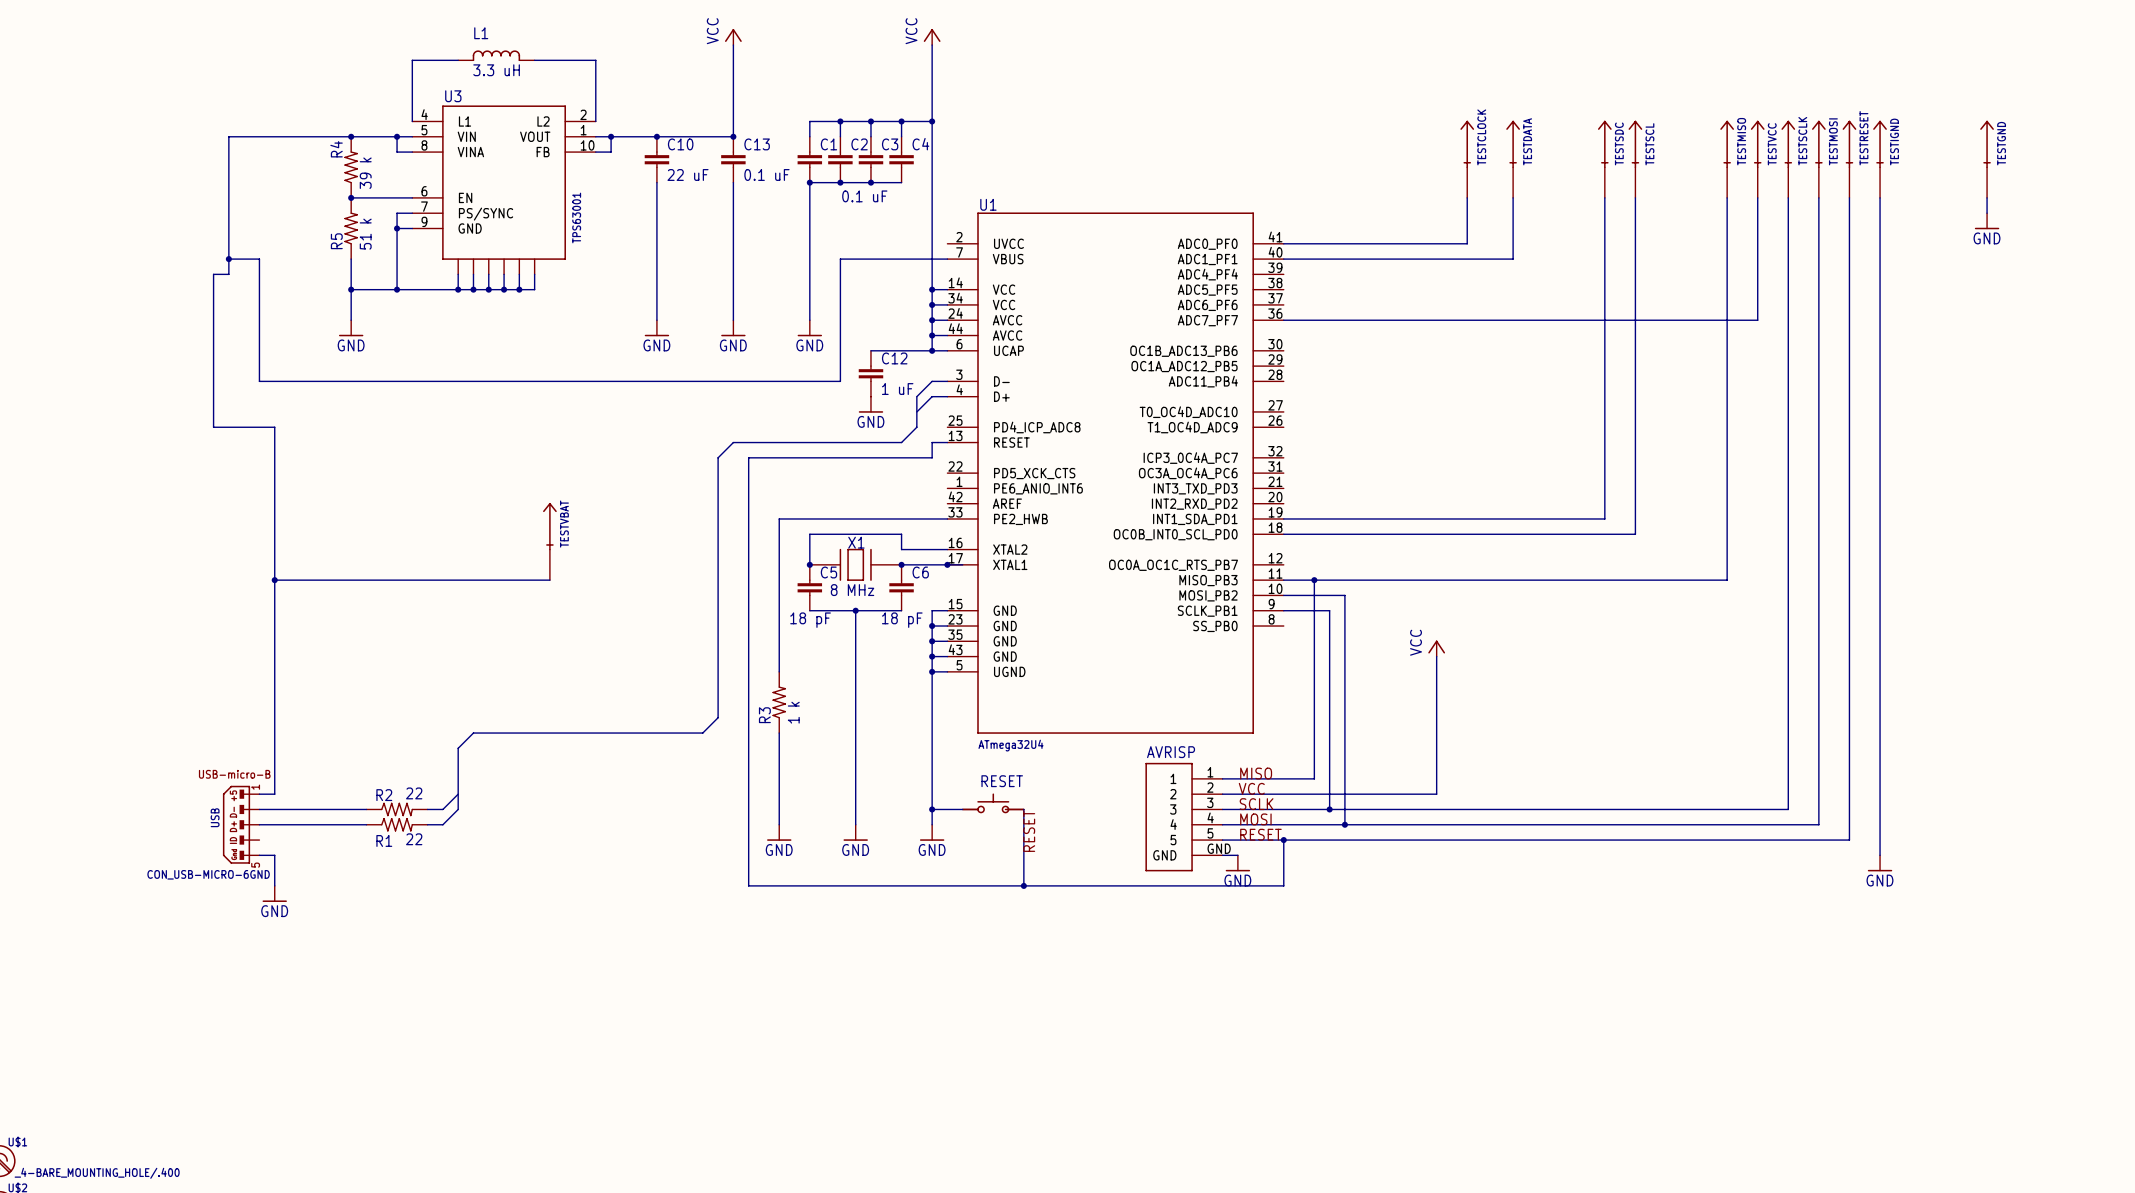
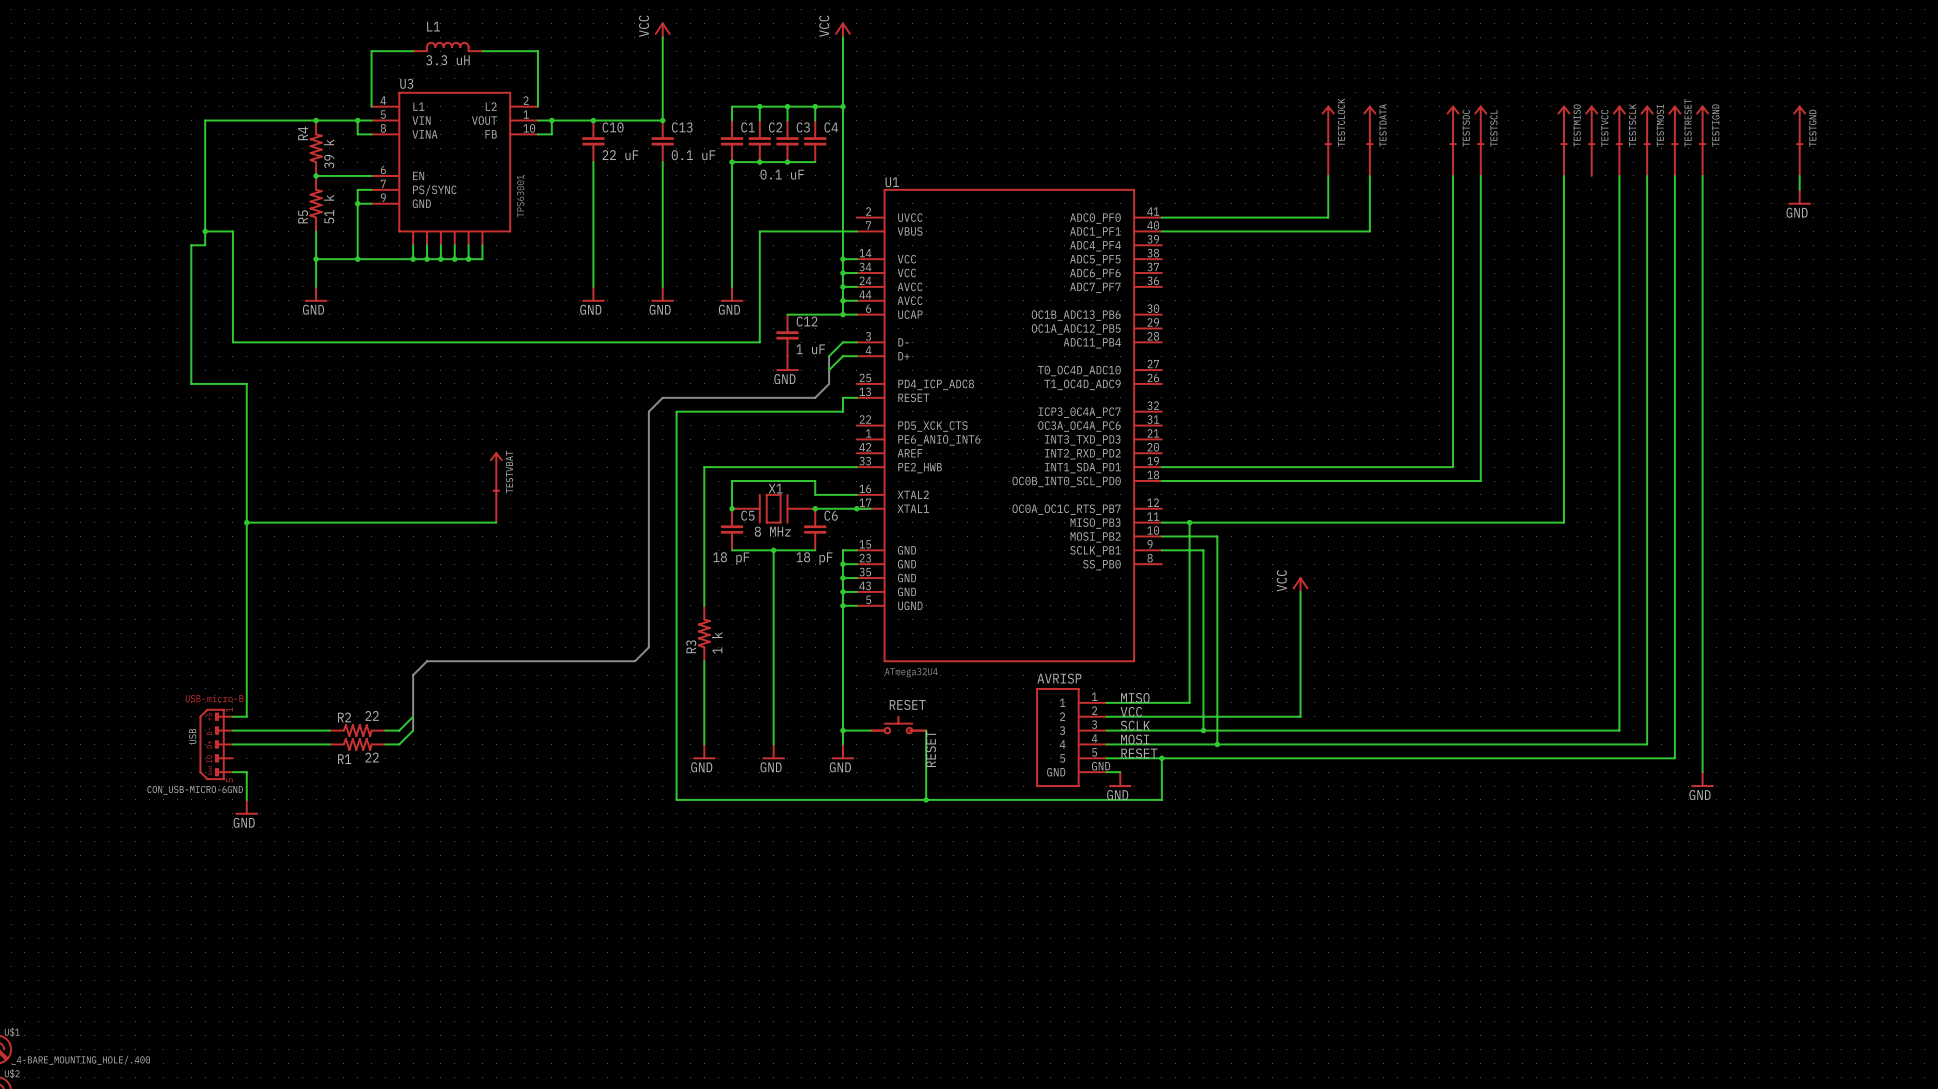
wire: (1757, 197) (1757, 320) (1283, 320) -> none

